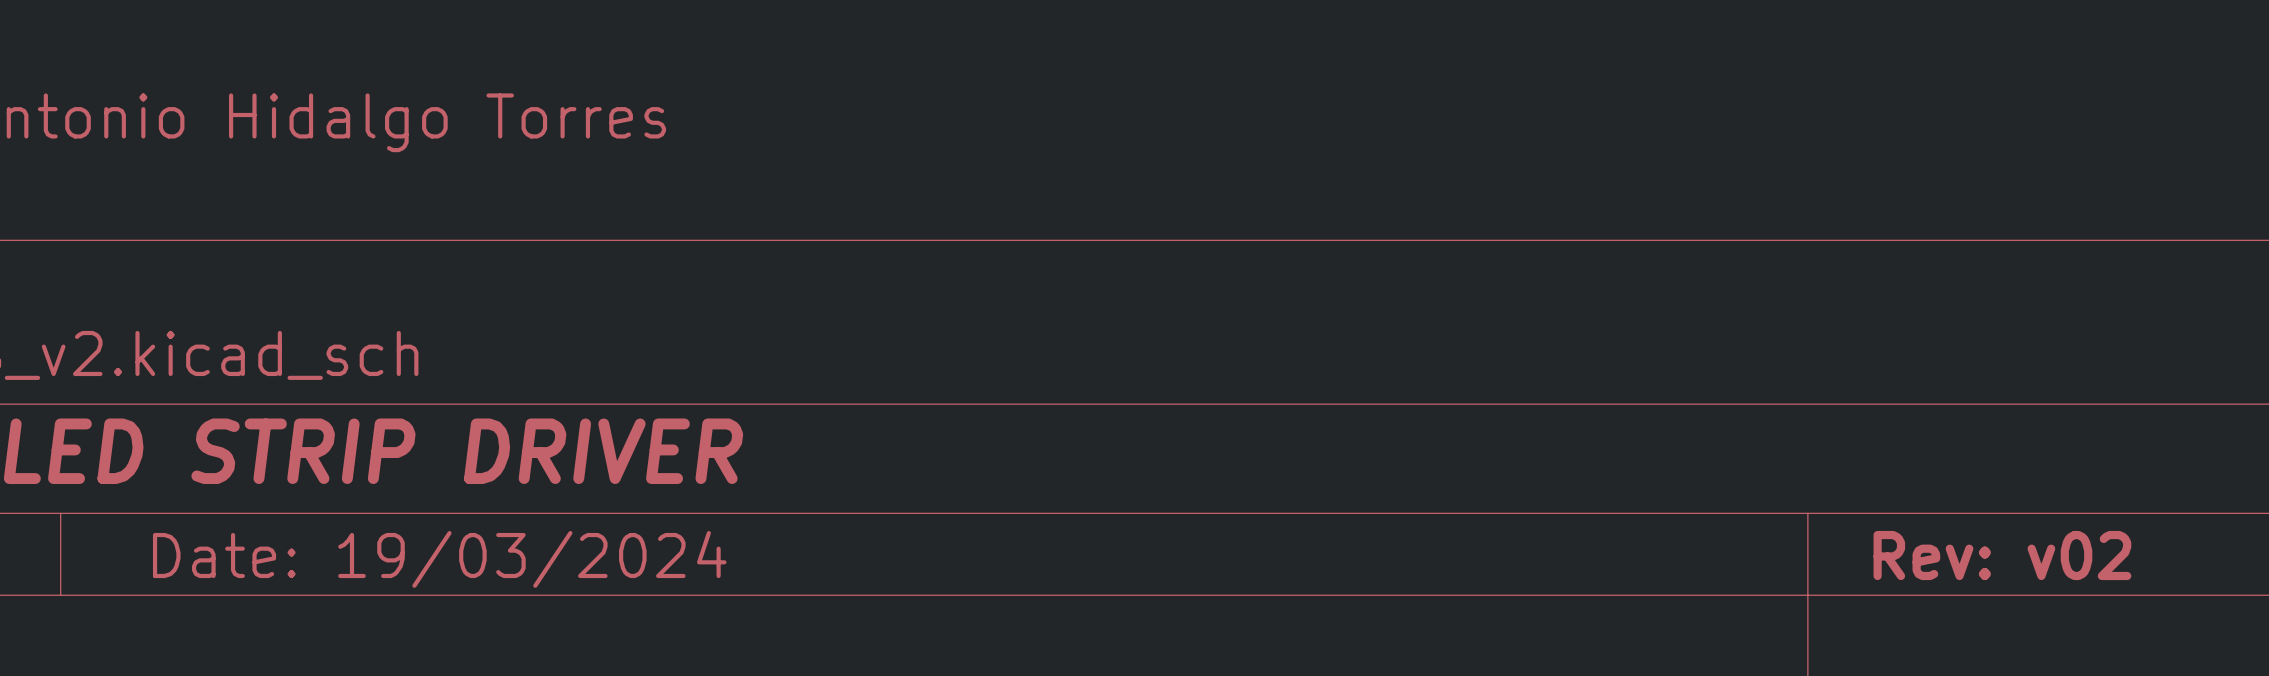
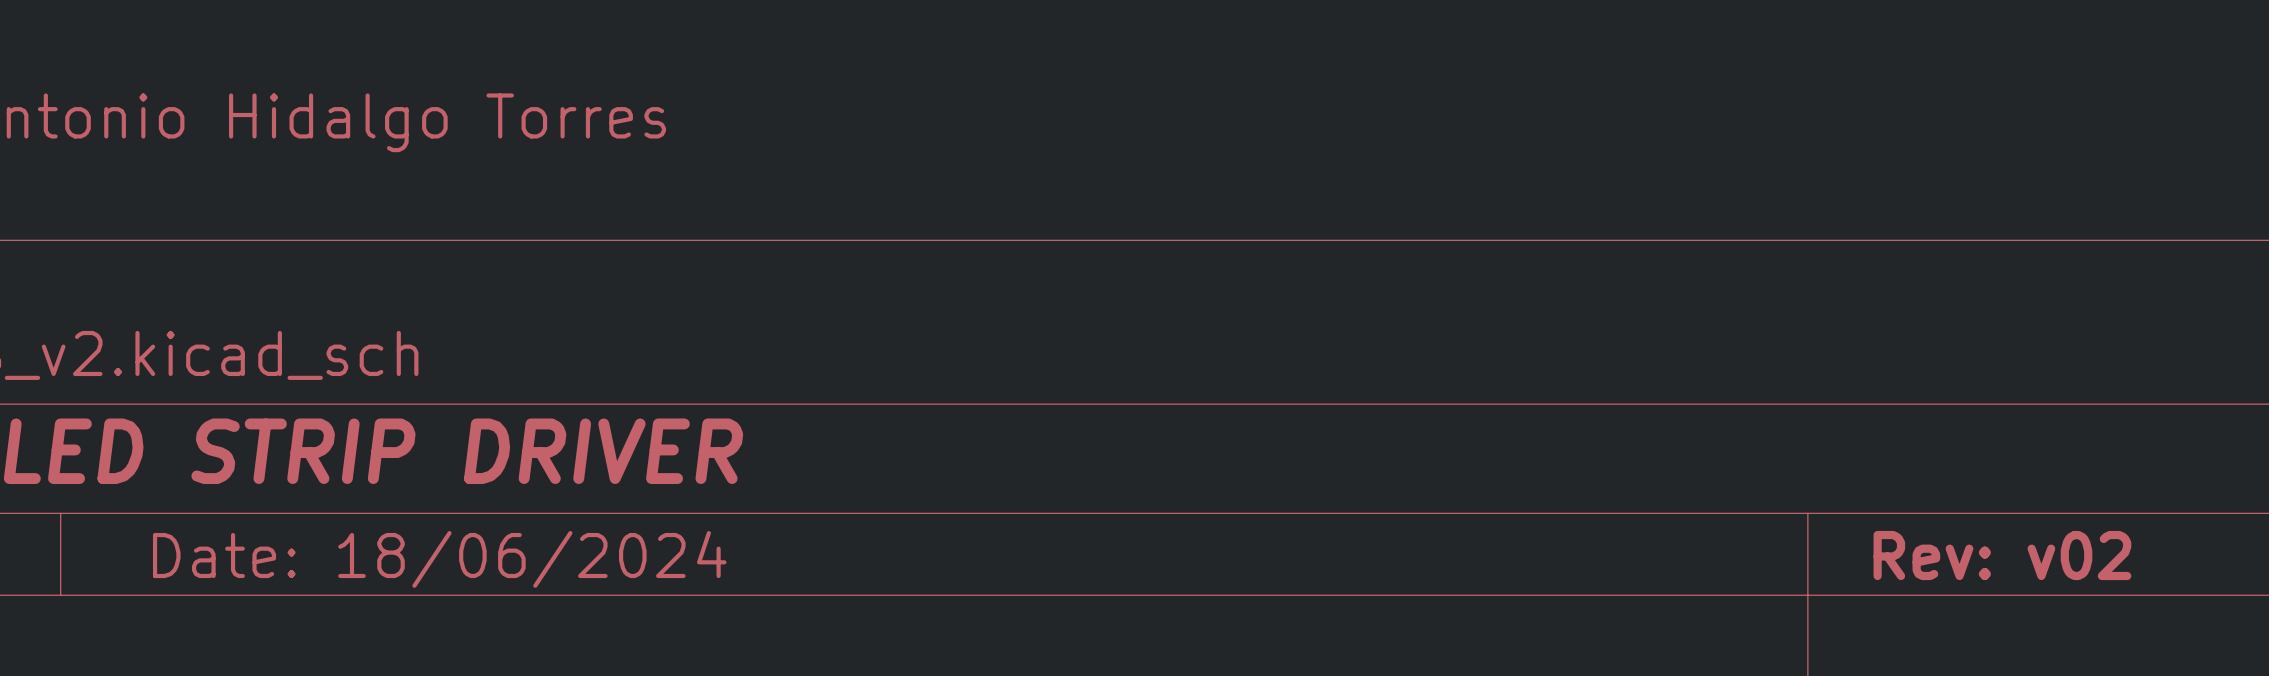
title block: Date: 19/03/2024 (439, 559) -> Date: 18/06/2024 (439, 559)

